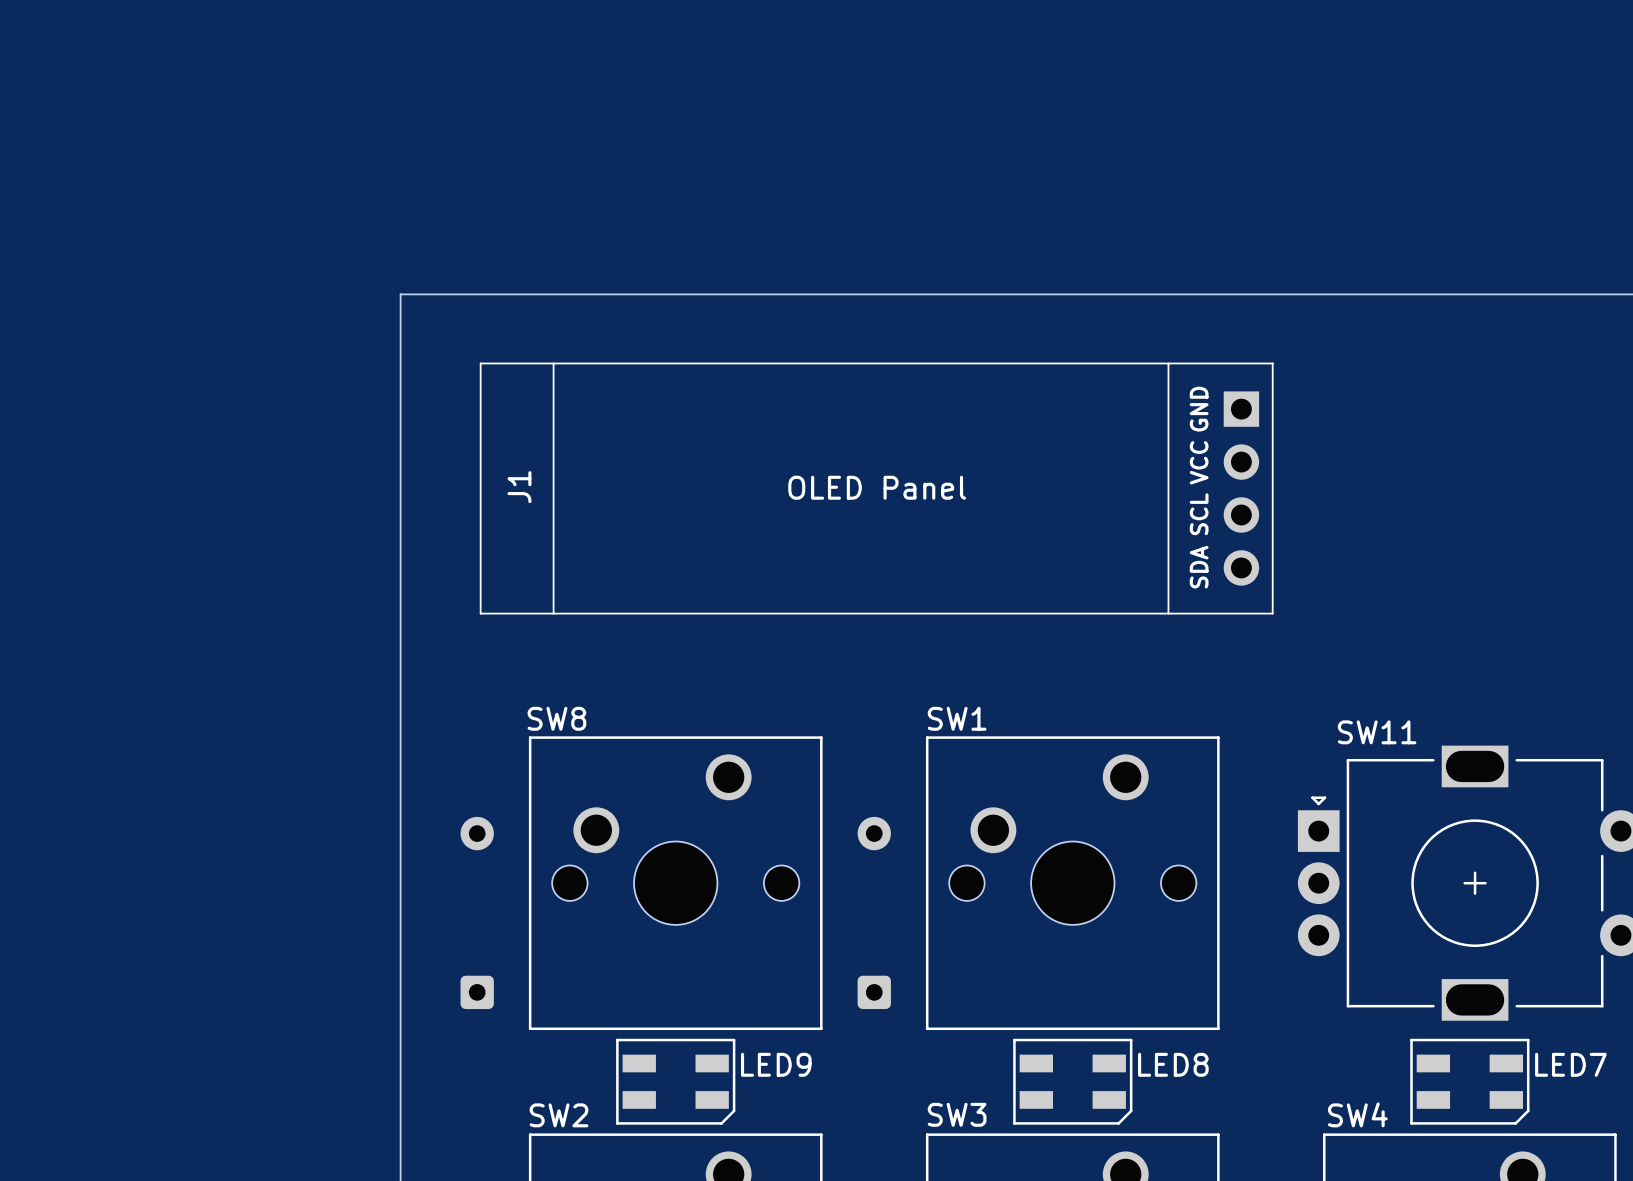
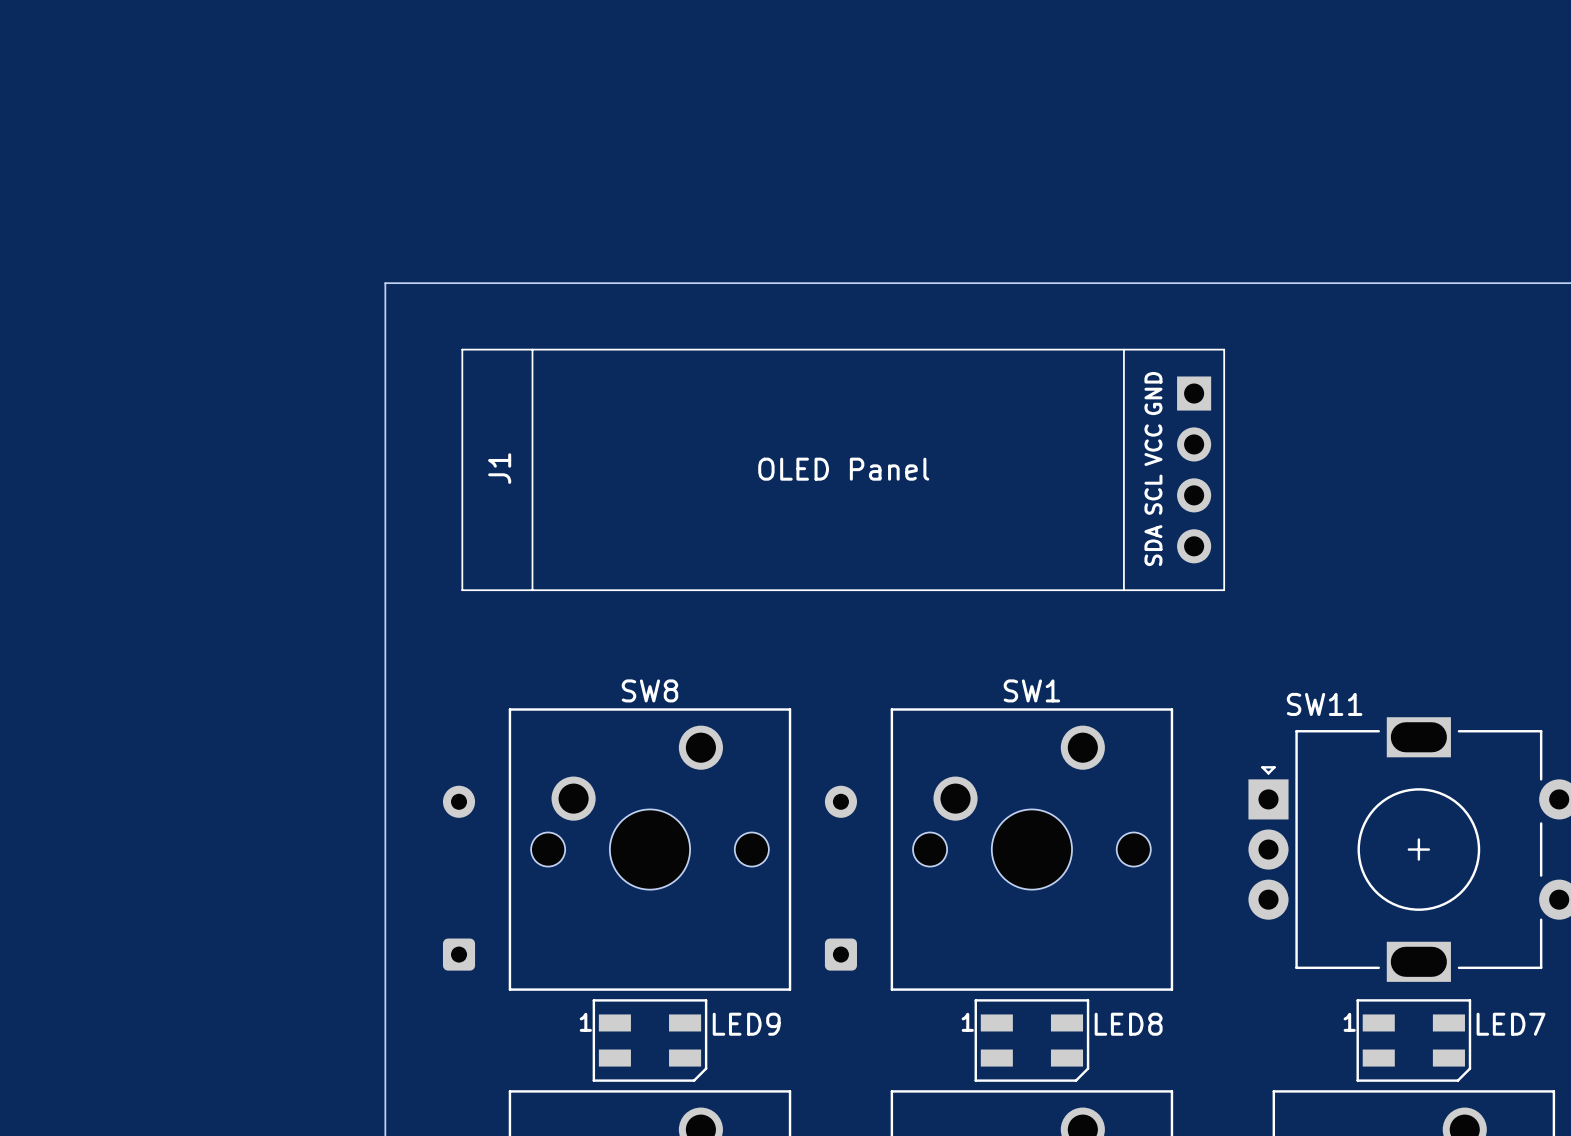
SW8 name position: SW8 (556, 718) -> SW8 (649, 690)
SW1 name position: SW1 (957, 718) -> SW1 (1031, 690)
LED9 text: none -> 1 (585, 1022)
LED8 text: none -> 1 (967, 1022)
LED7 text: none -> 1 (1349, 1022)
SW3 name: SW3 (957, 1114) -> none
SW4 name: SW4 (1357, 1114) -> none
SW2 name: SW2 (559, 1115) -> none

